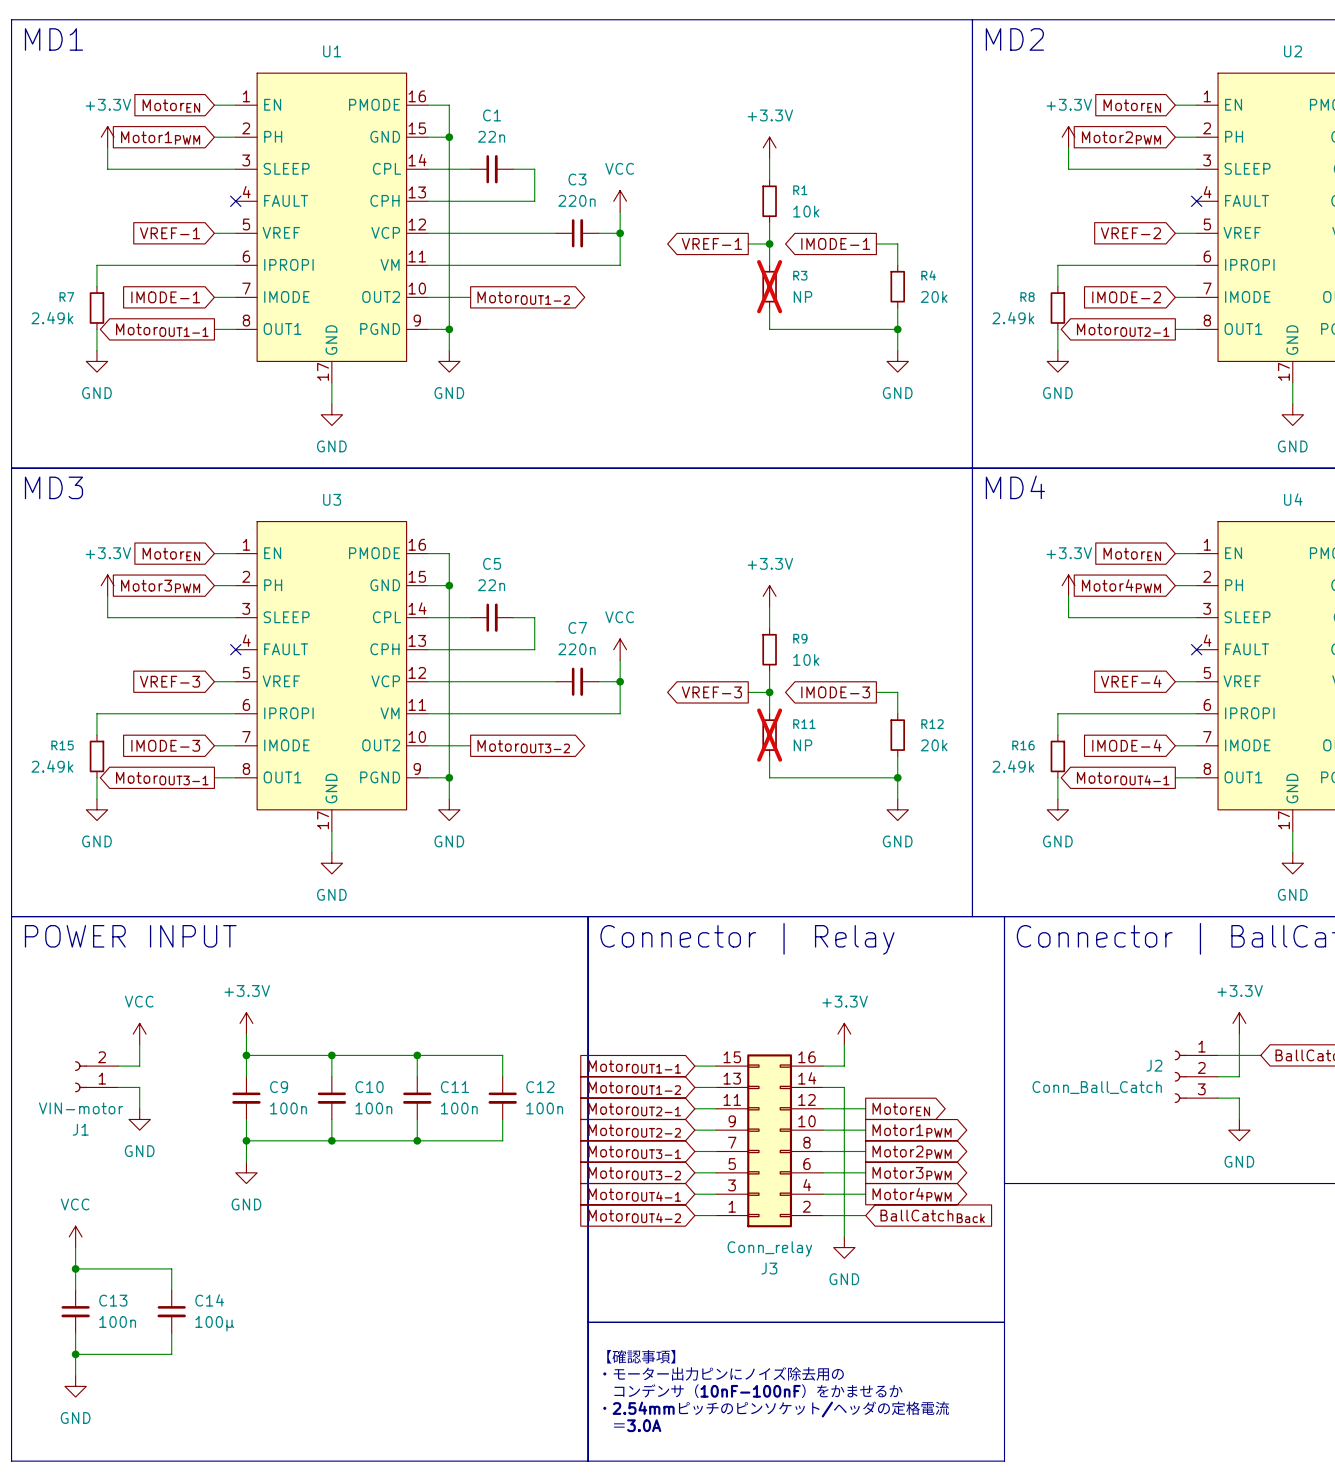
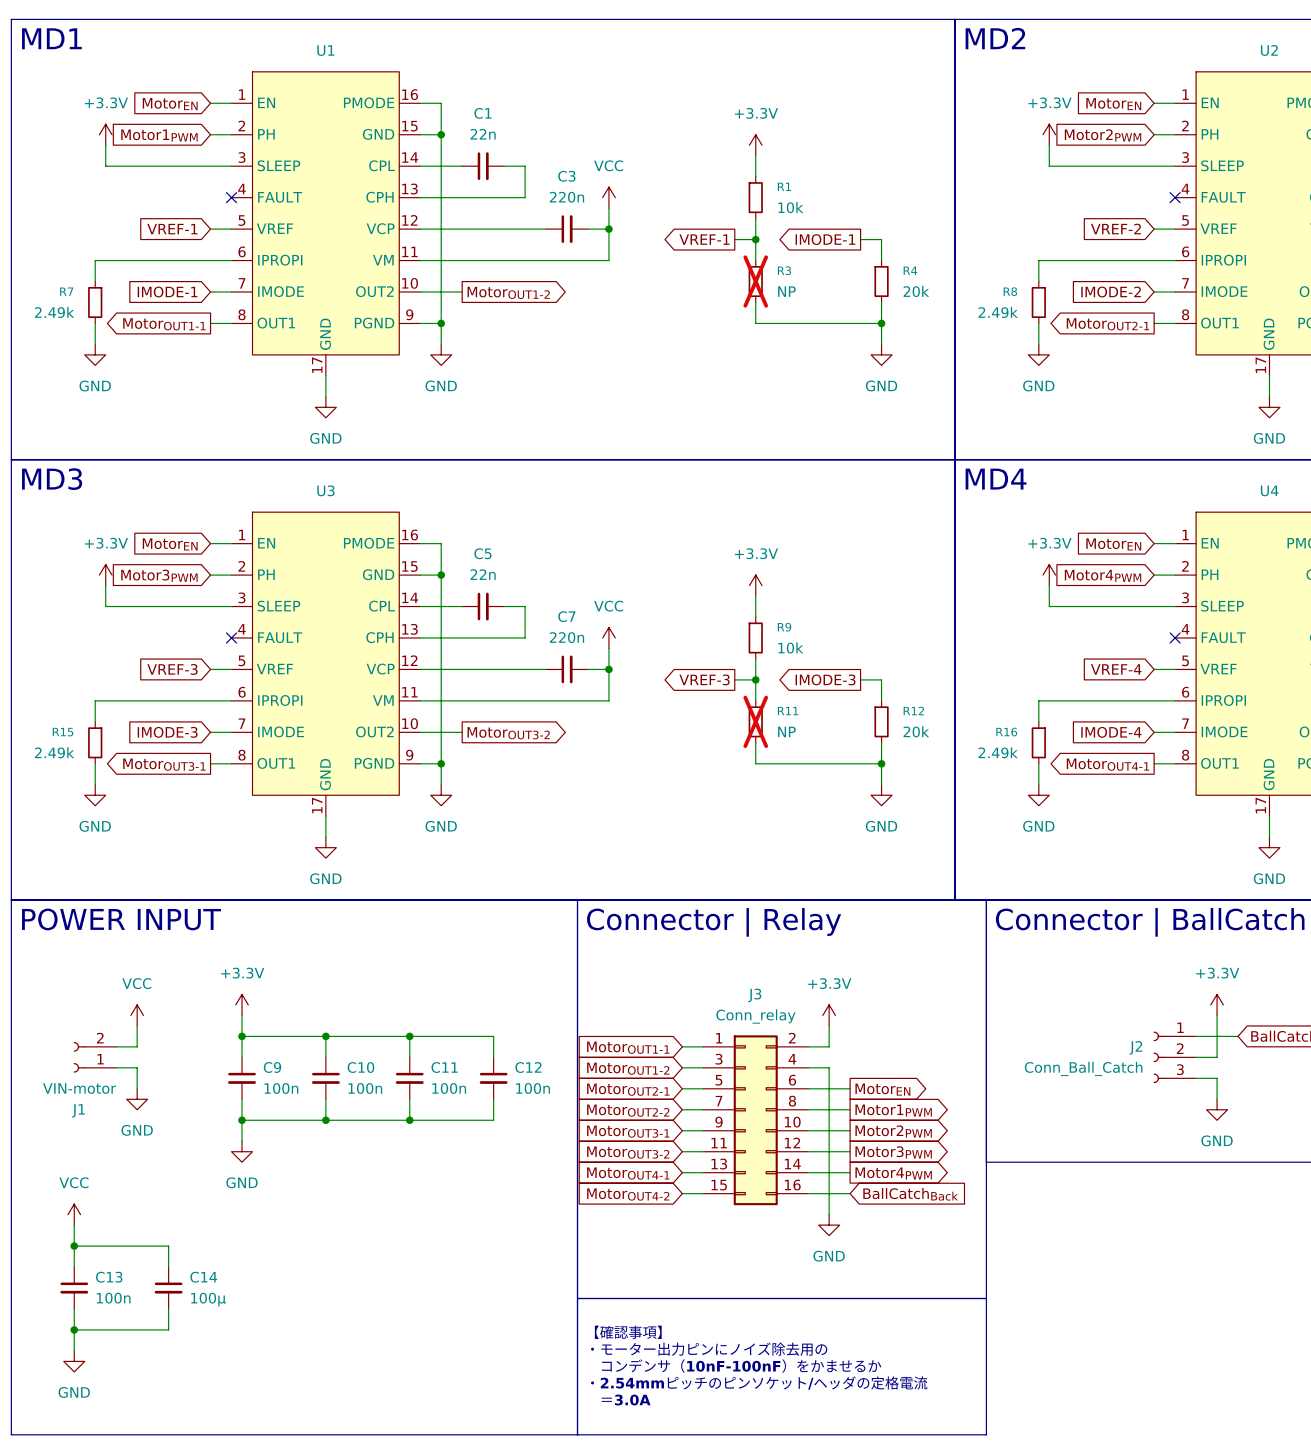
J3 flip: as is (769, 1140) -> up-down (755, 1120)

